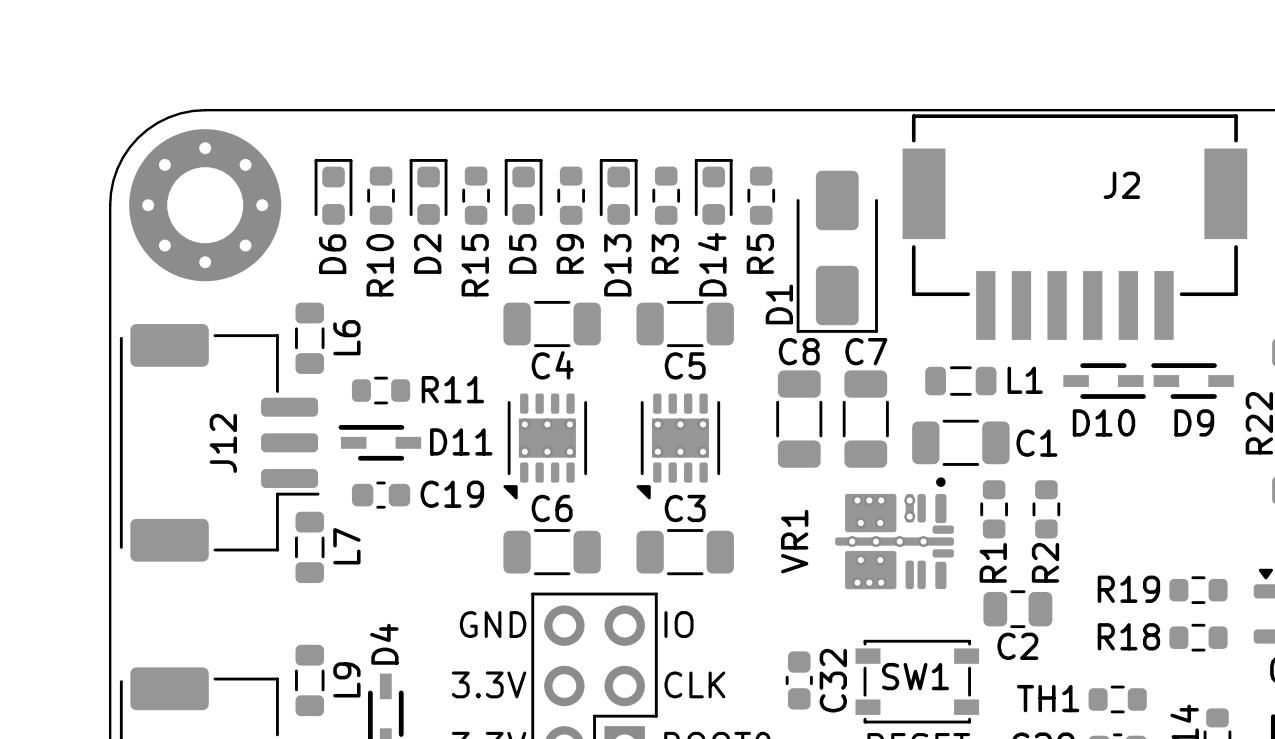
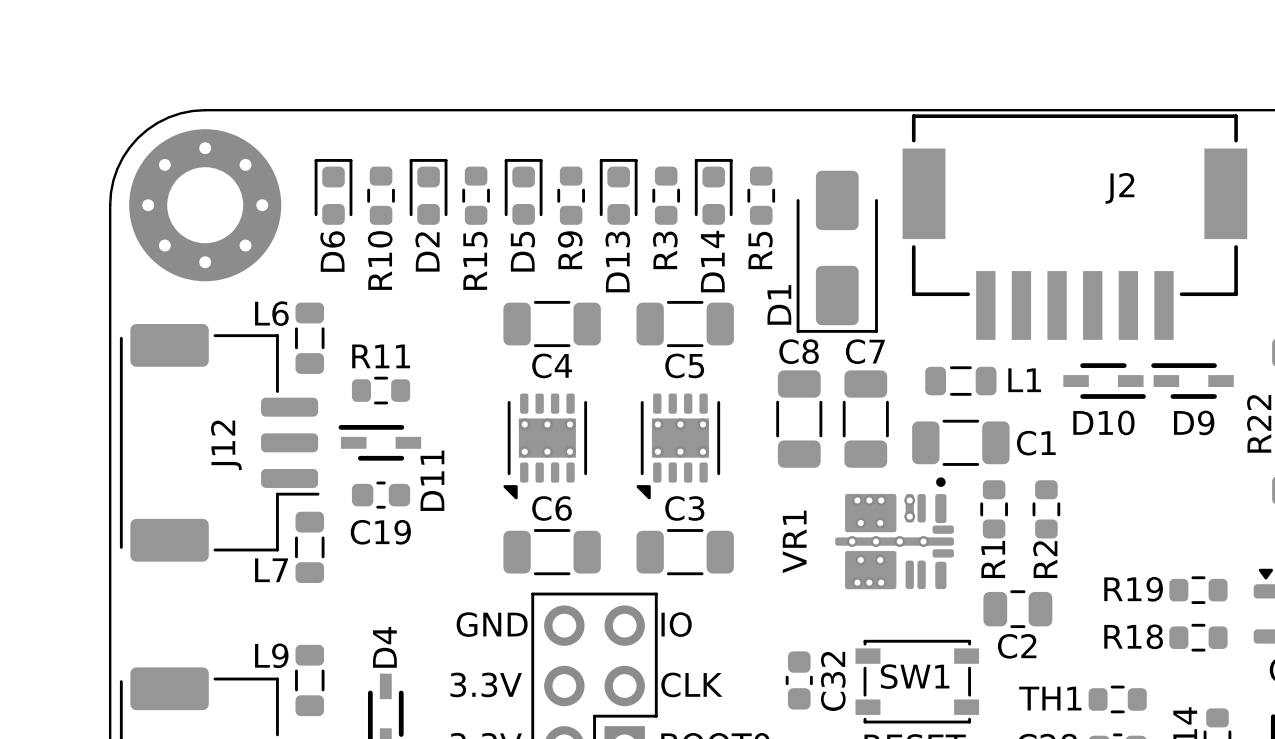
L6 name rotation: 0° (346, 337) -> 90° clockwise (271, 313)
L6 name position: L6 (346, 337) -> L6 (271, 313)
R11 name position: R11 (452, 389) -> R11 (381, 356)
D11 name rotation: 0° (461, 441) -> 90° counterclockwise (432, 480)
C19 name position: C19 (452, 494) -> C19 (380, 532)
L7 name rotation: 0° (346, 546) -> 90° clockwise (271, 570)
L7 name position: L7 (346, 546) -> L7 (271, 570)
L9 name rotation: 0° (346, 679) -> 90° clockwise (271, 655)
L9 name position: L9 (346, 679) -> L9 (271, 655)

